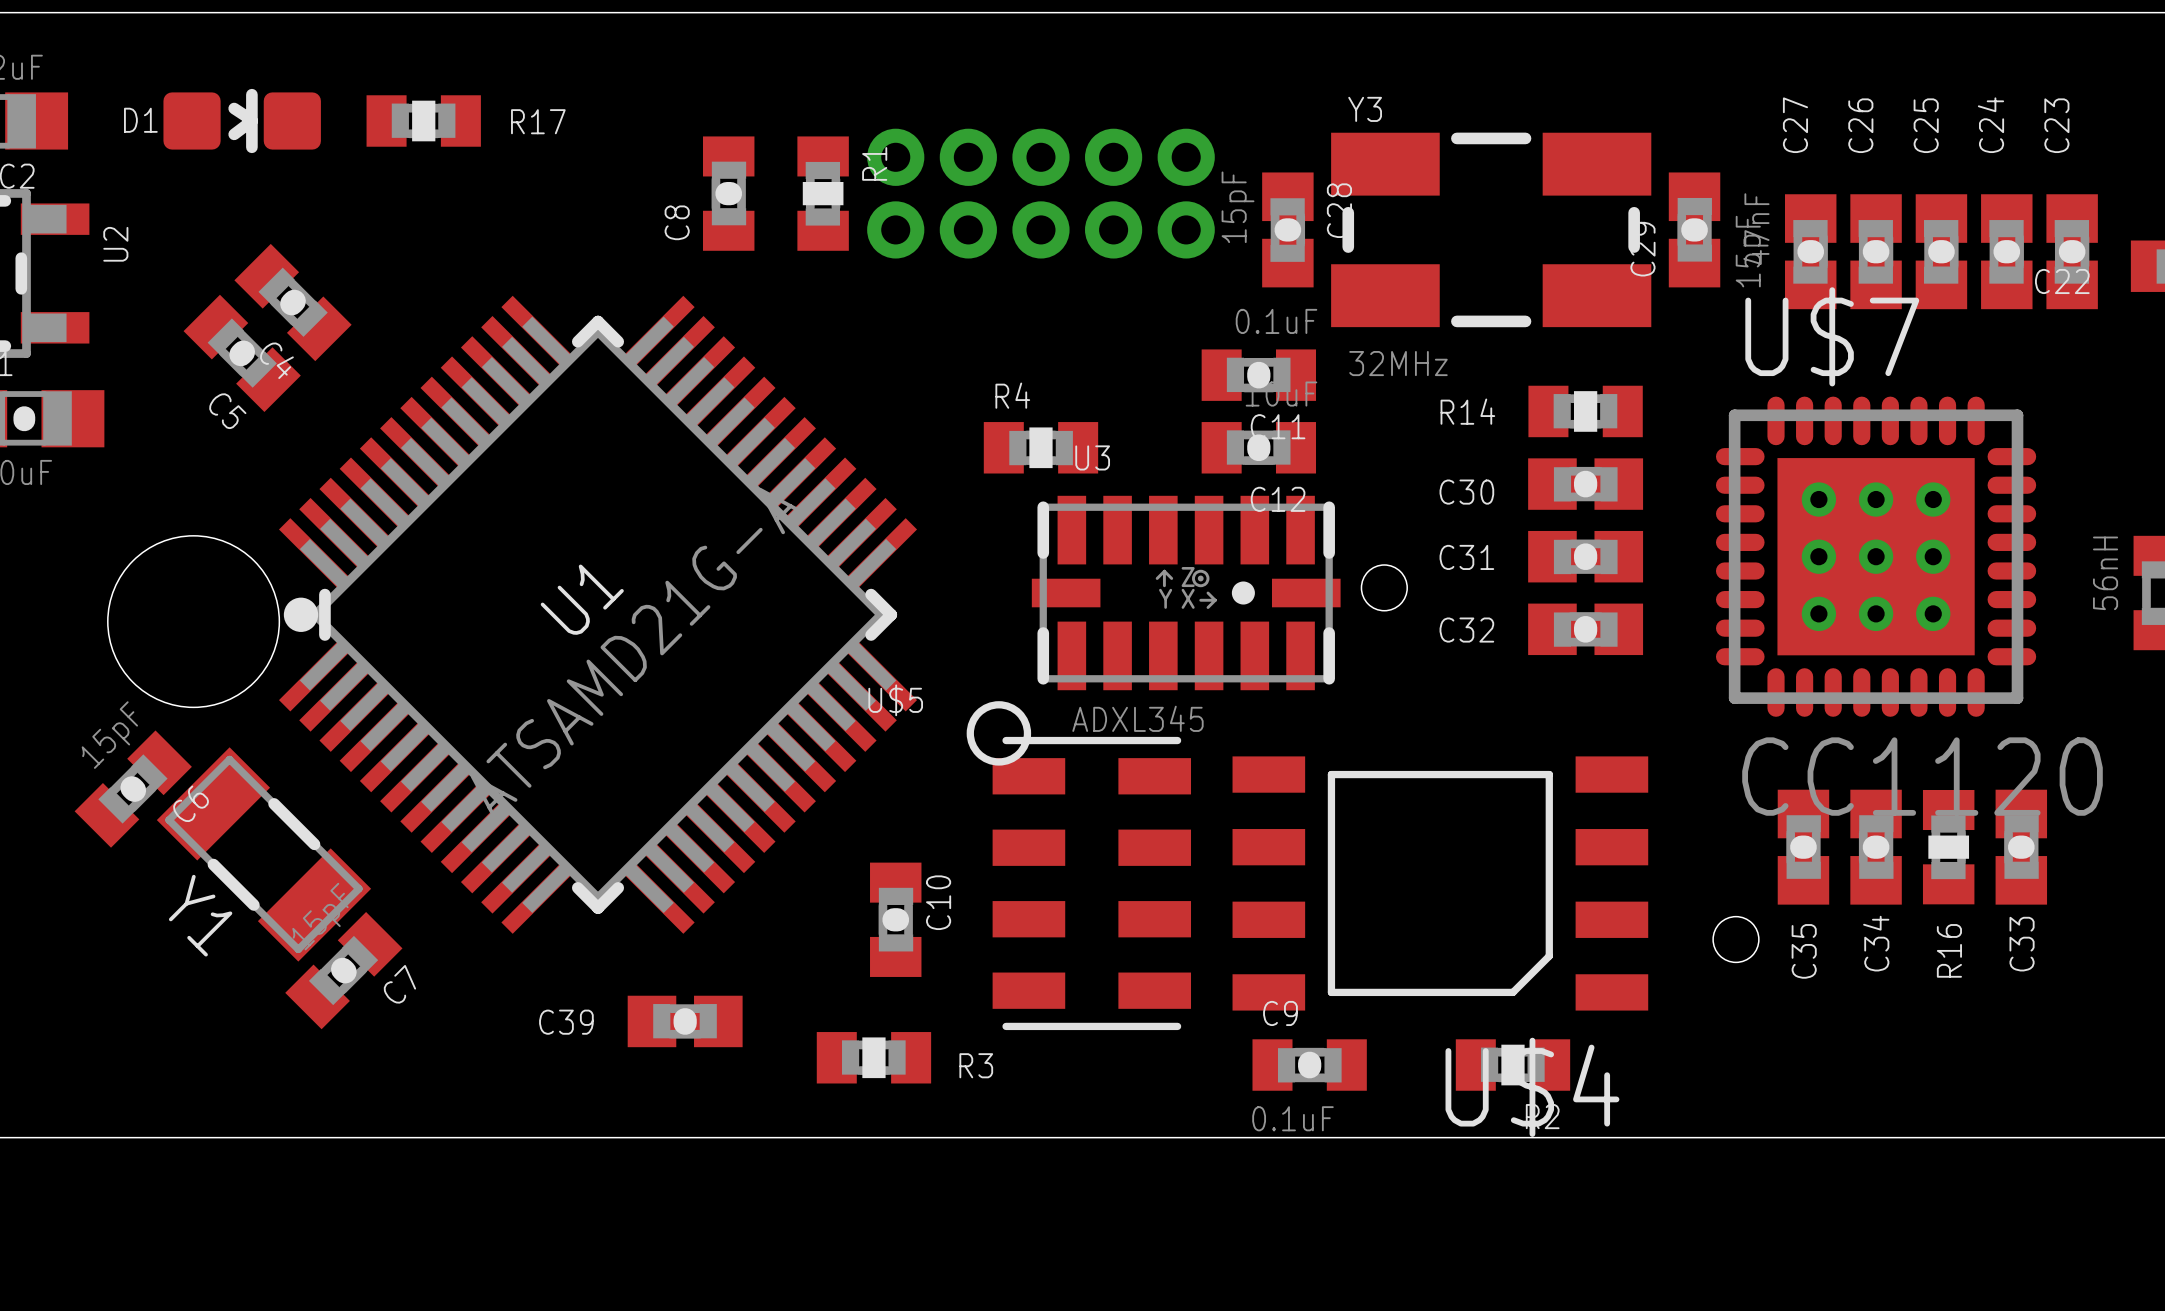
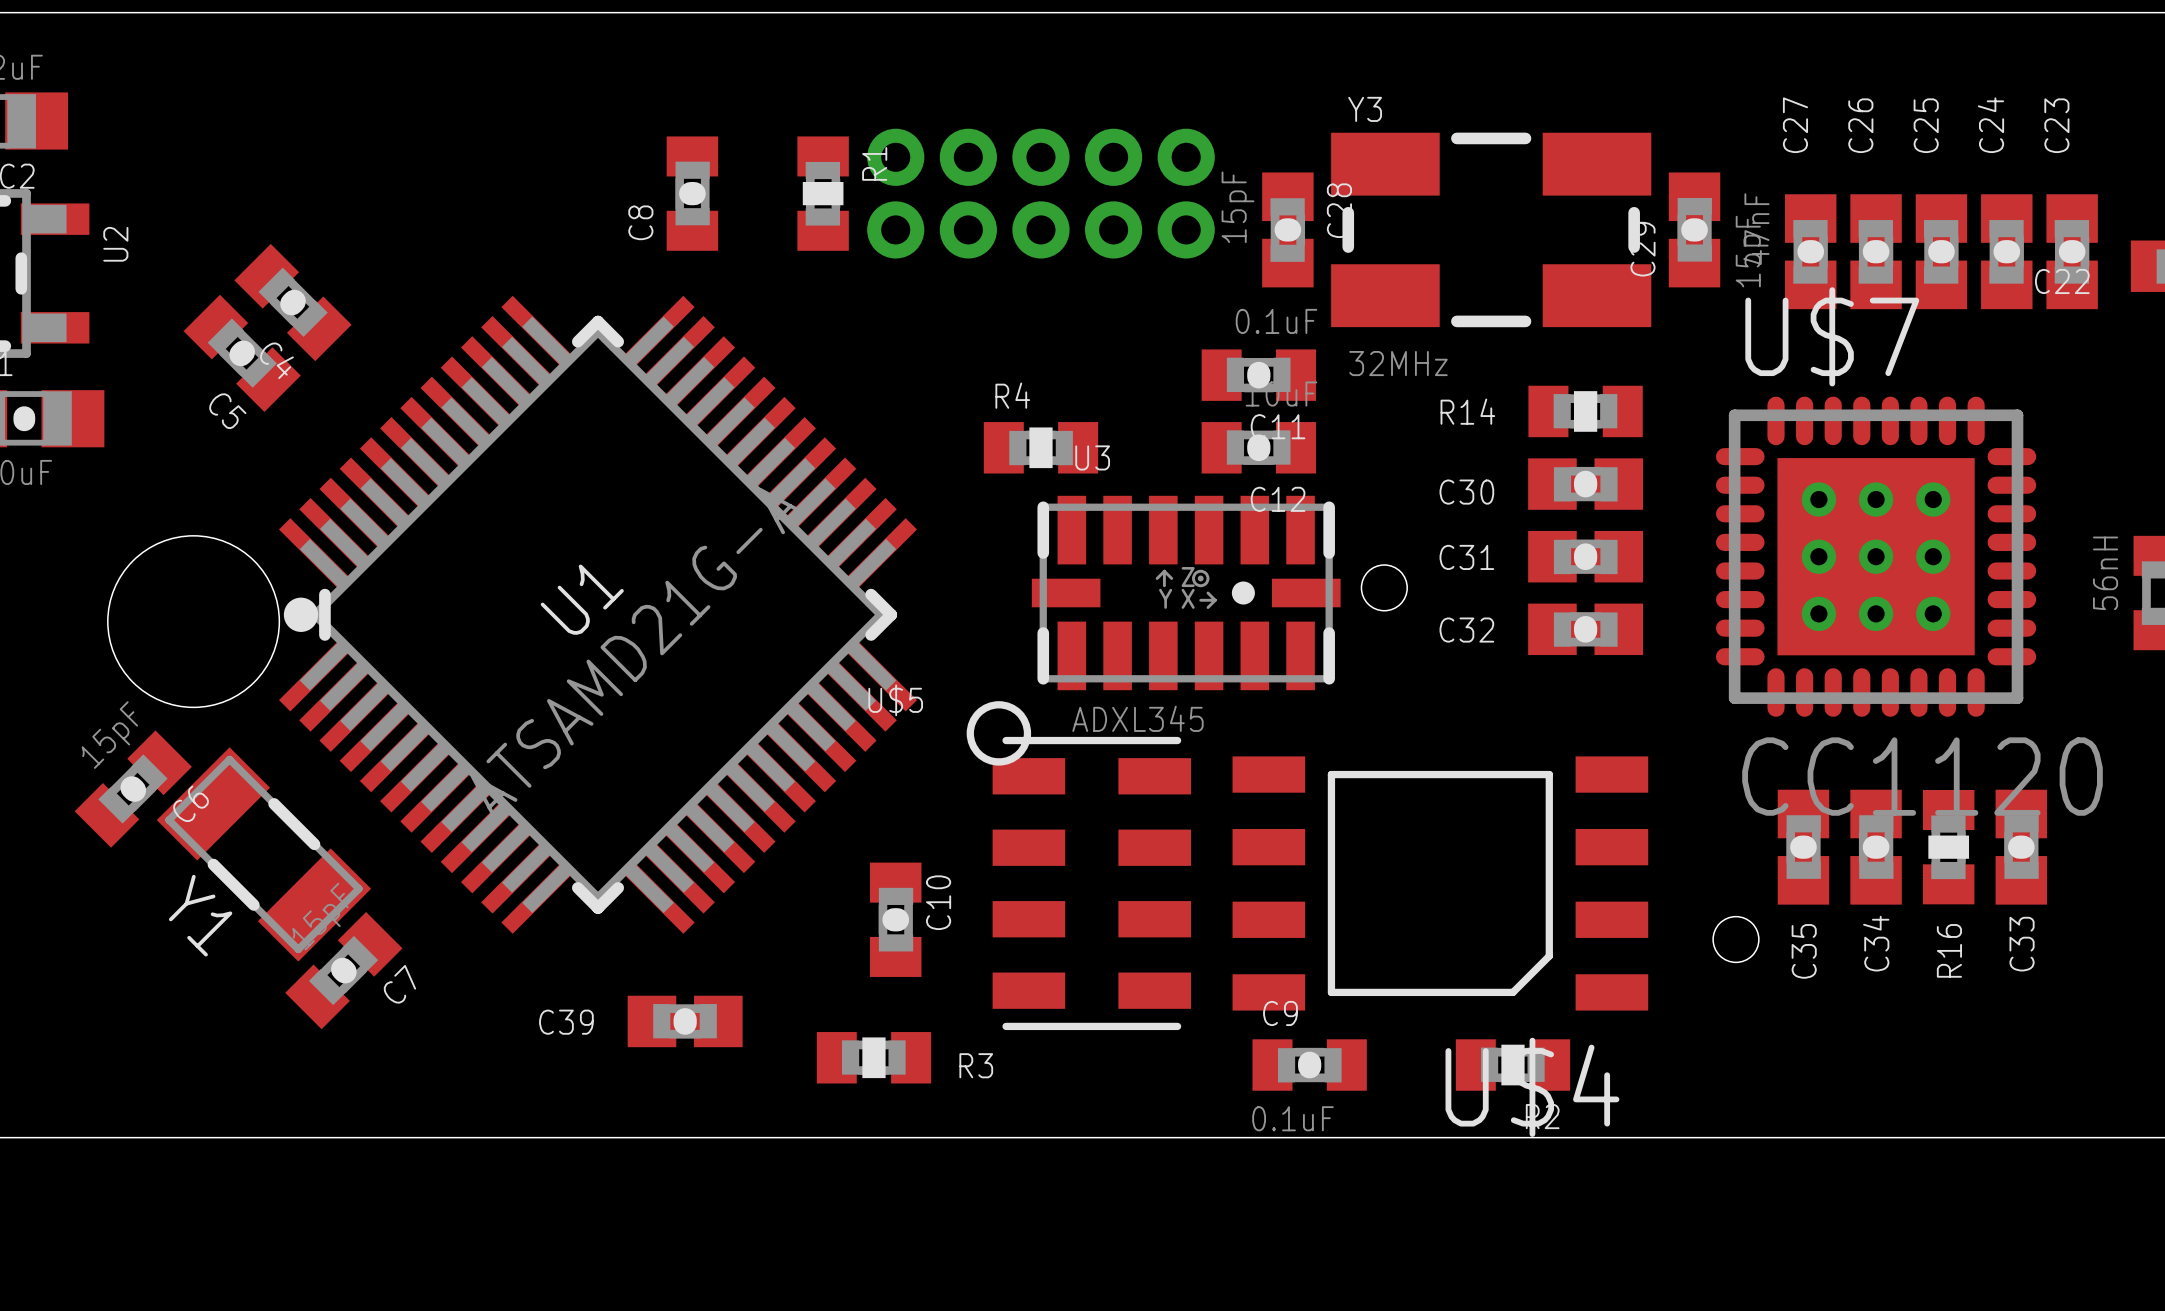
D1: (242, 120) -> none
R17: (423, 120) -> none
C8 position: (728, 193) -> (692, 193)

